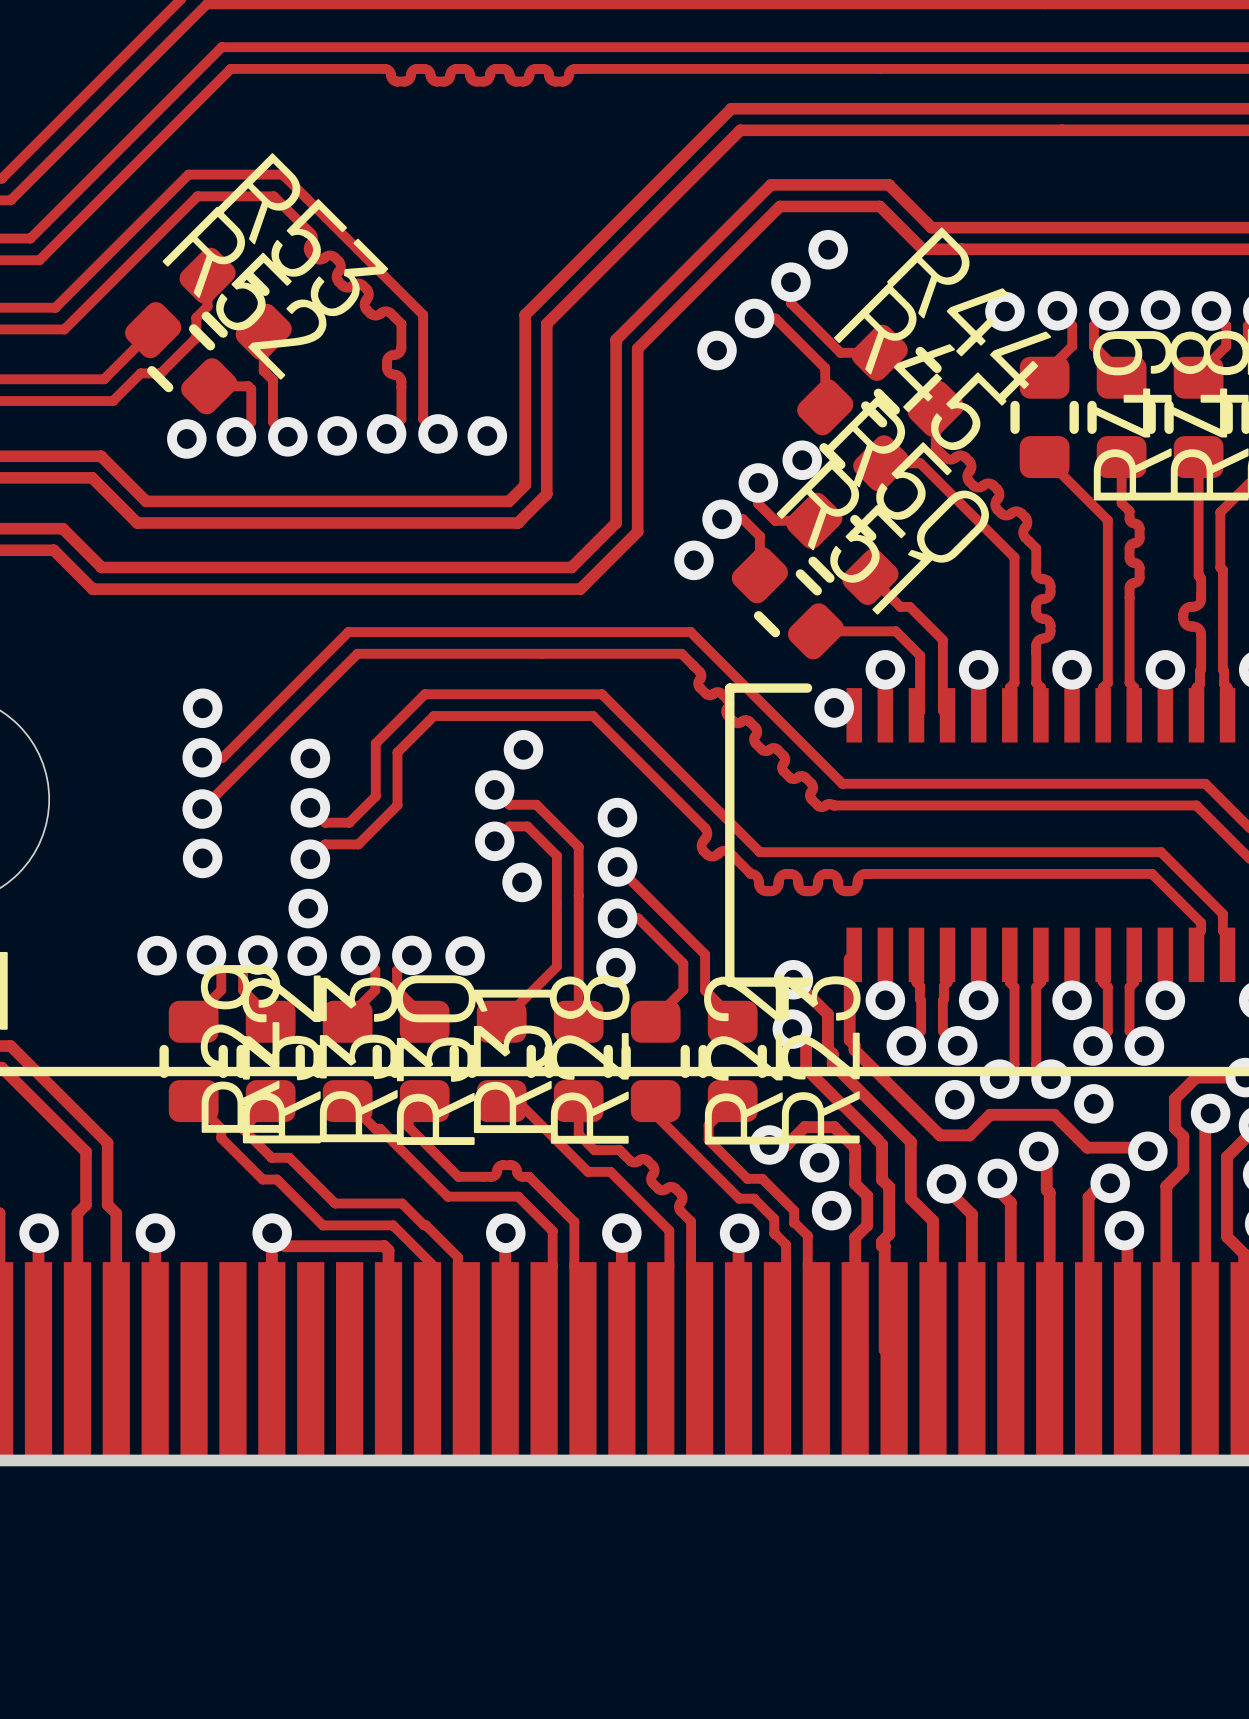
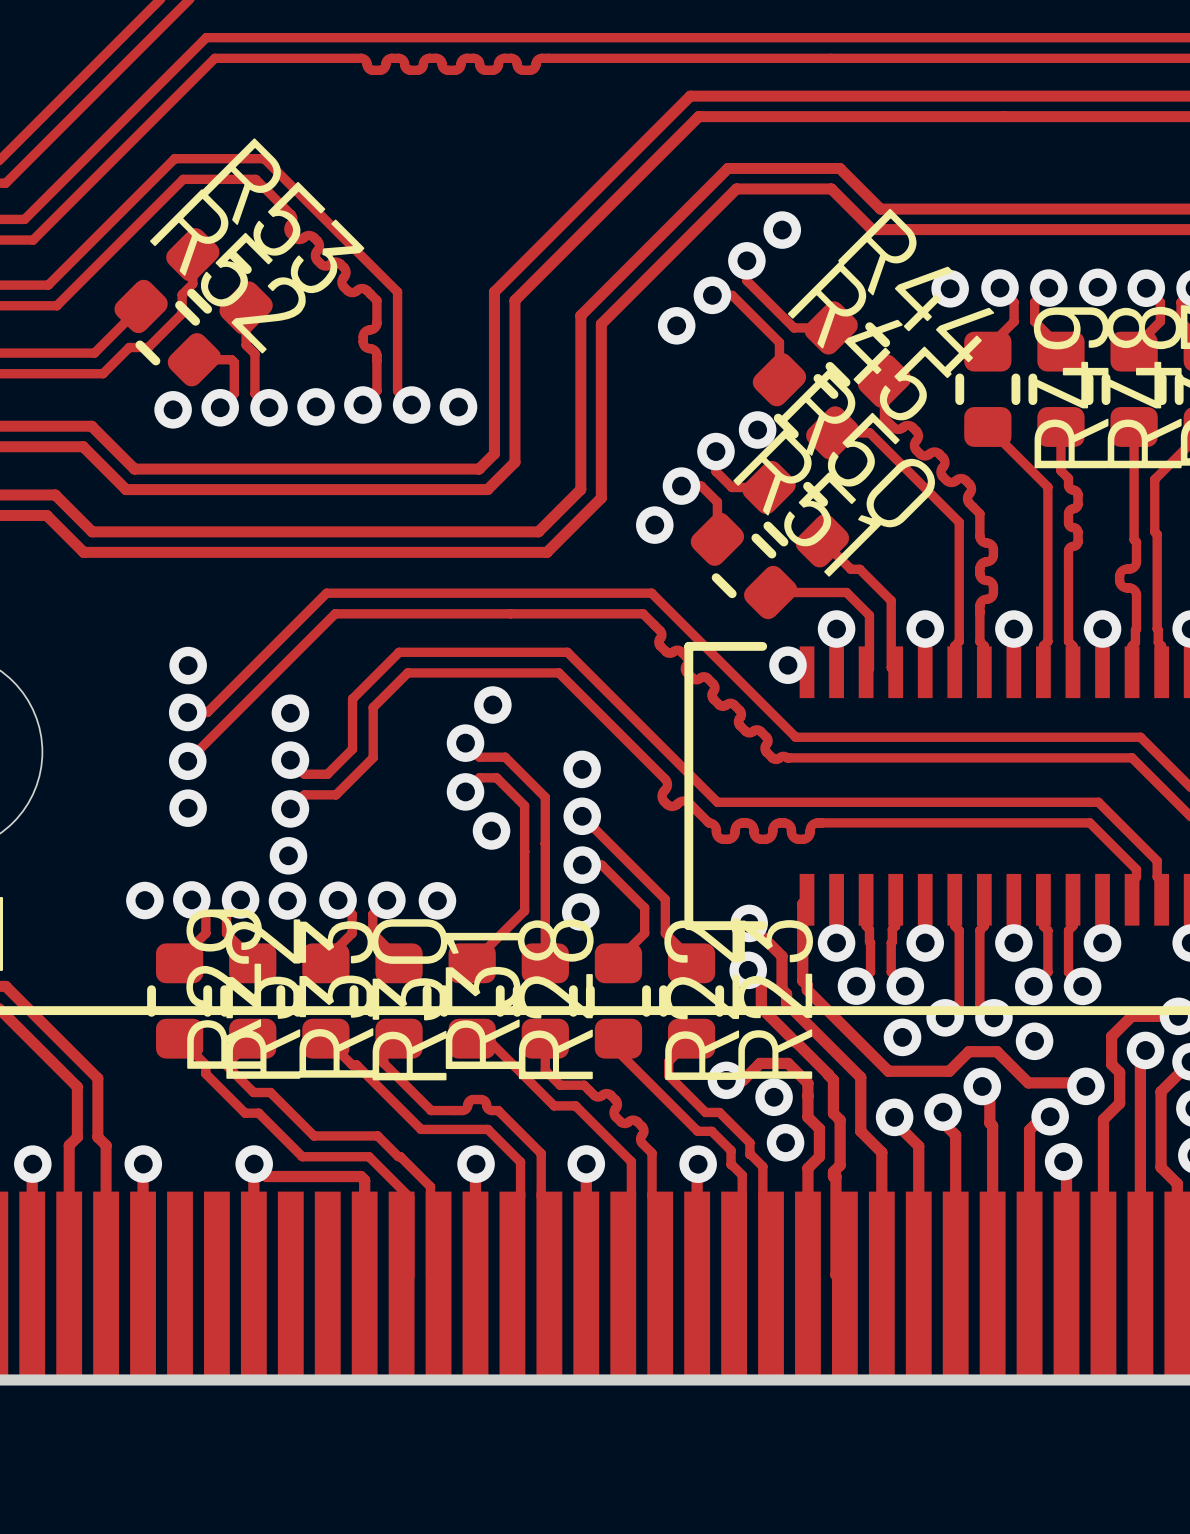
track: (1024, 1114) (990, 1114) (969, 1135) -> (968, 1051) (949, 1071) (916, 1071)

